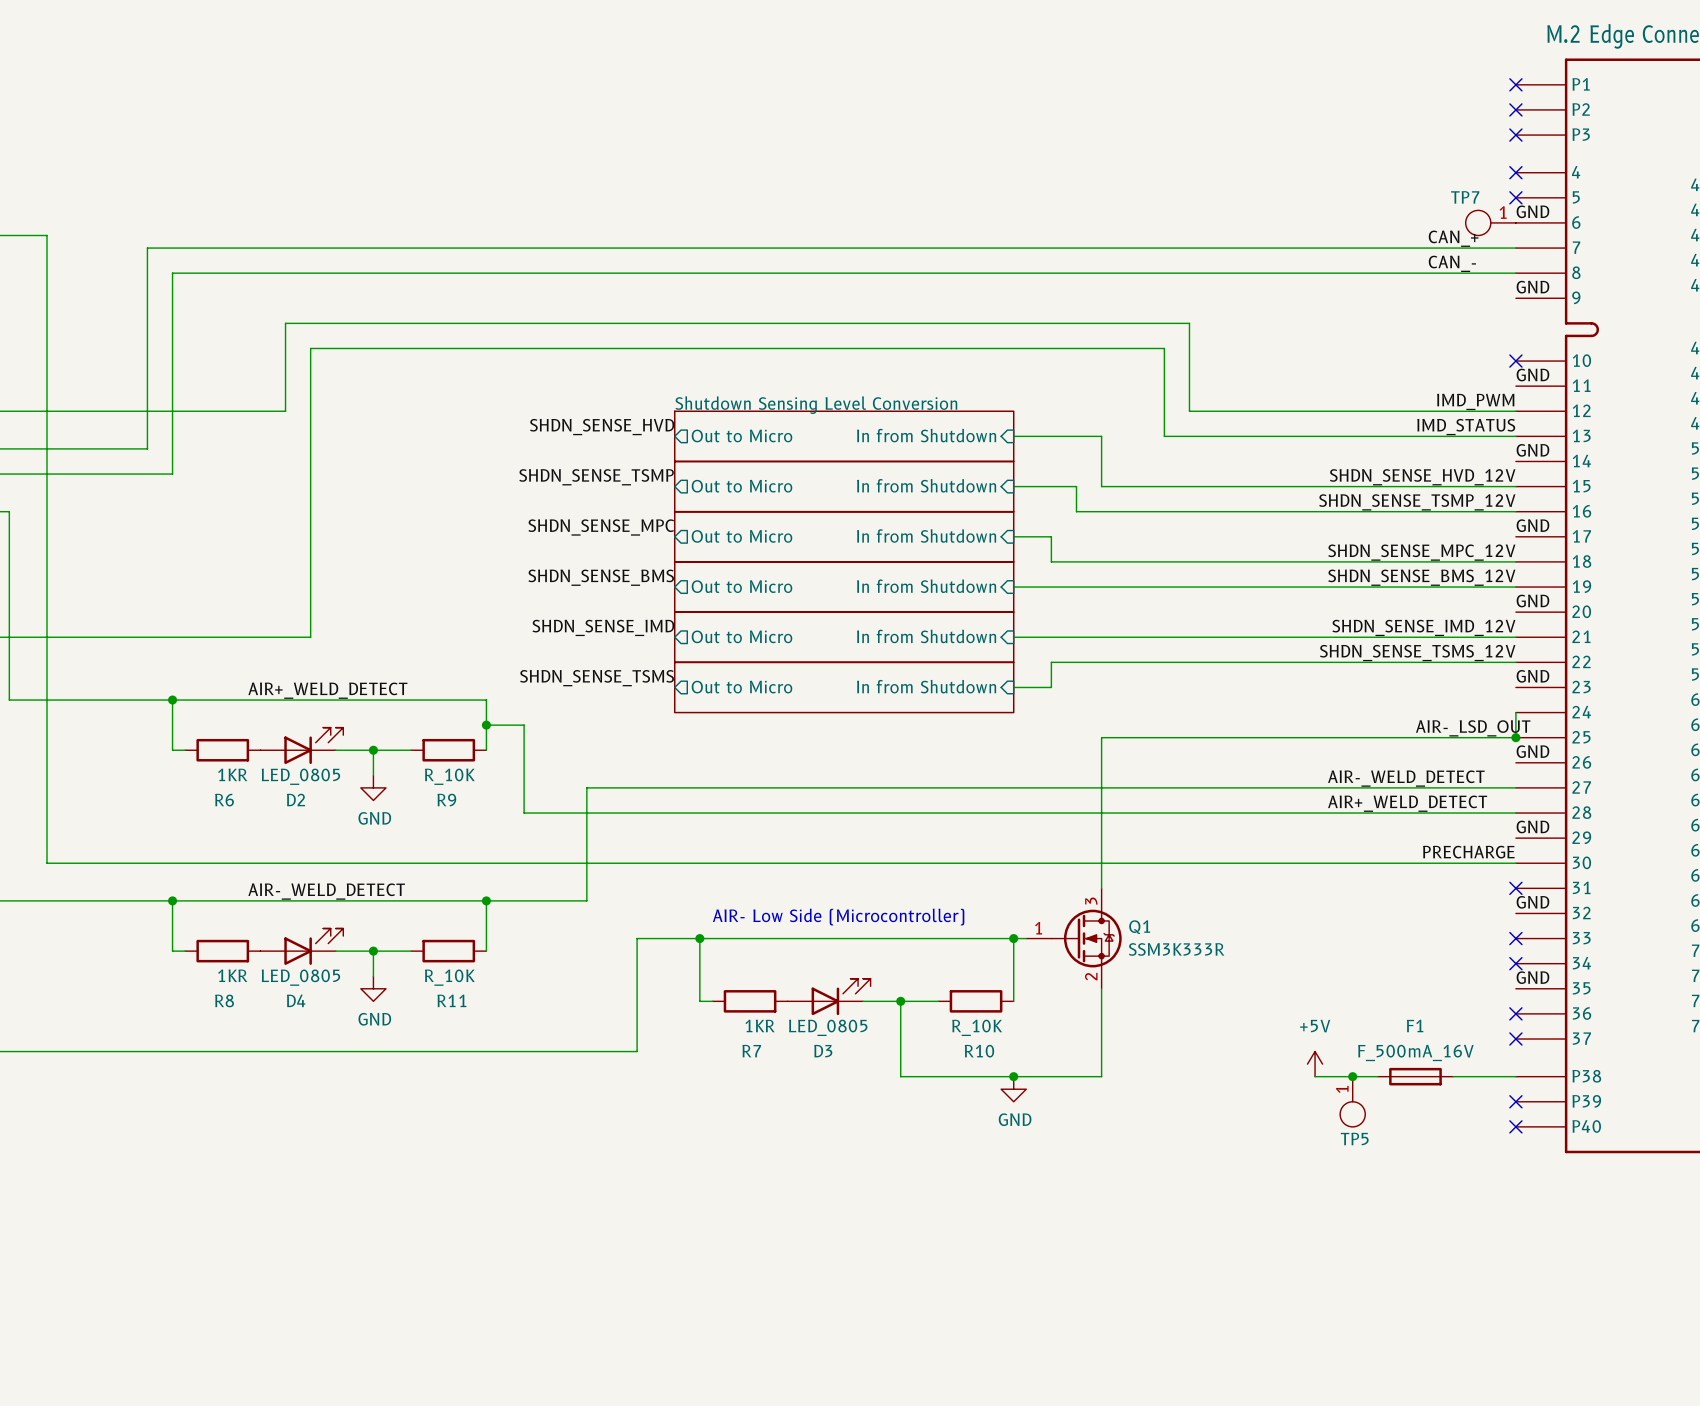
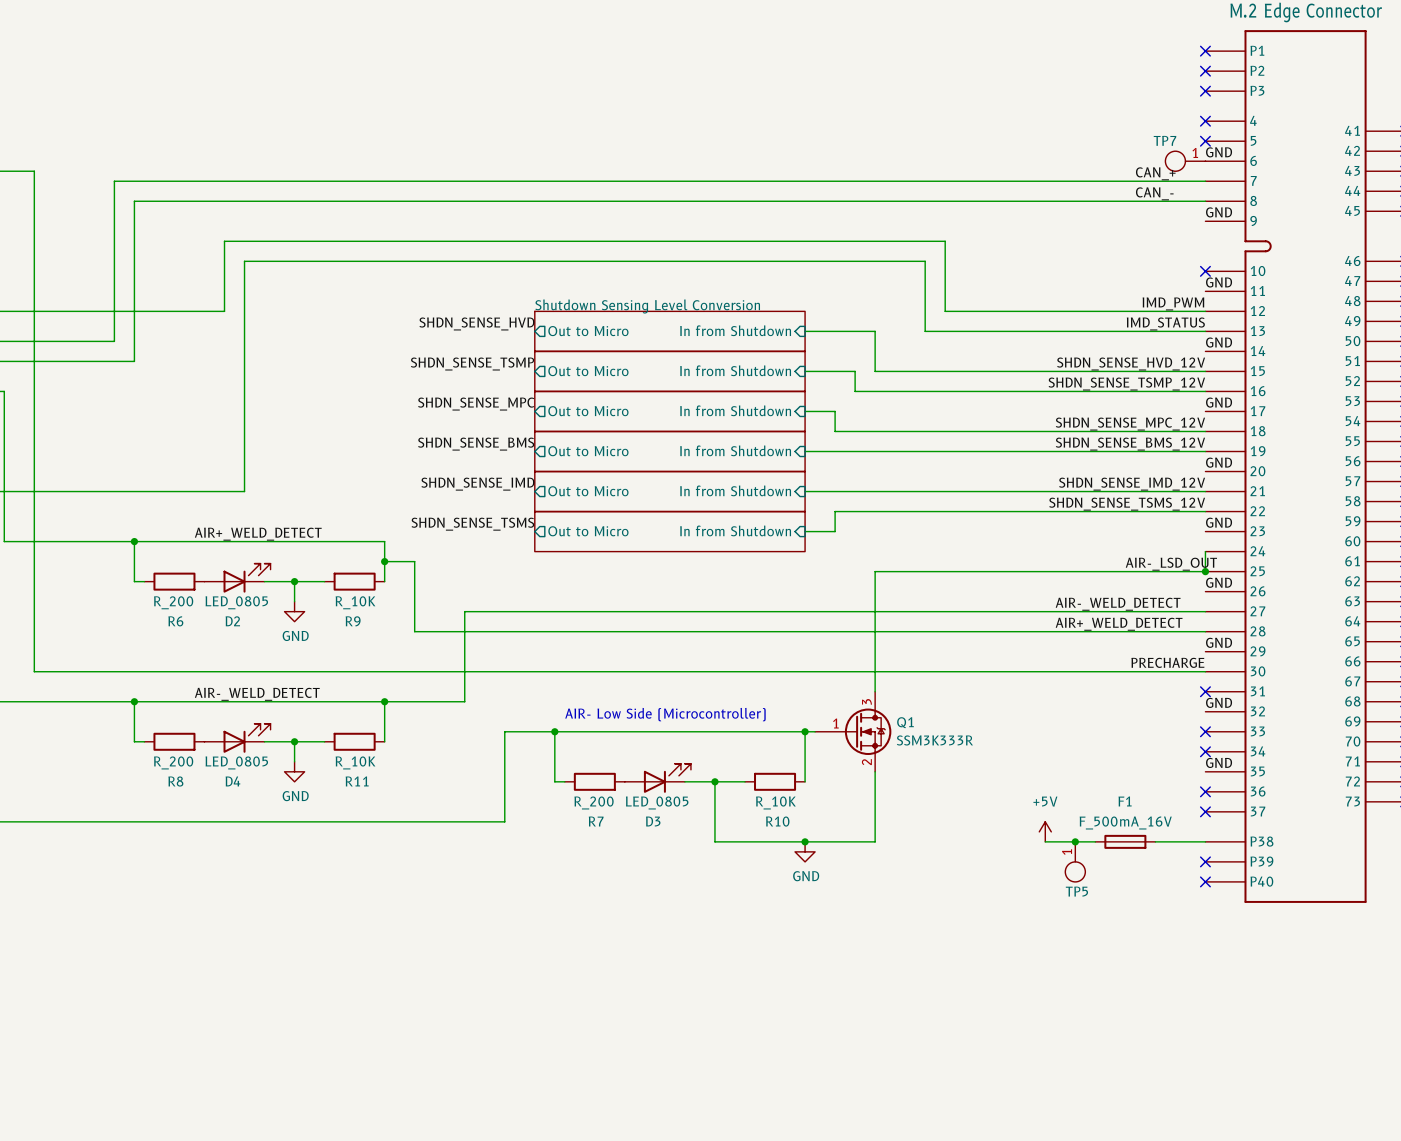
R6 value: 1KR (232, 774) -> R_200 (173, 602)
Q1 symbol: [1026, 888, 1122, 989] -> [815, 691, 892, 772]
R8 value: 1KR (232, 975) -> R_200 (173, 762)
R7 value: 1KR (760, 1025) -> R_200 (594, 802)

